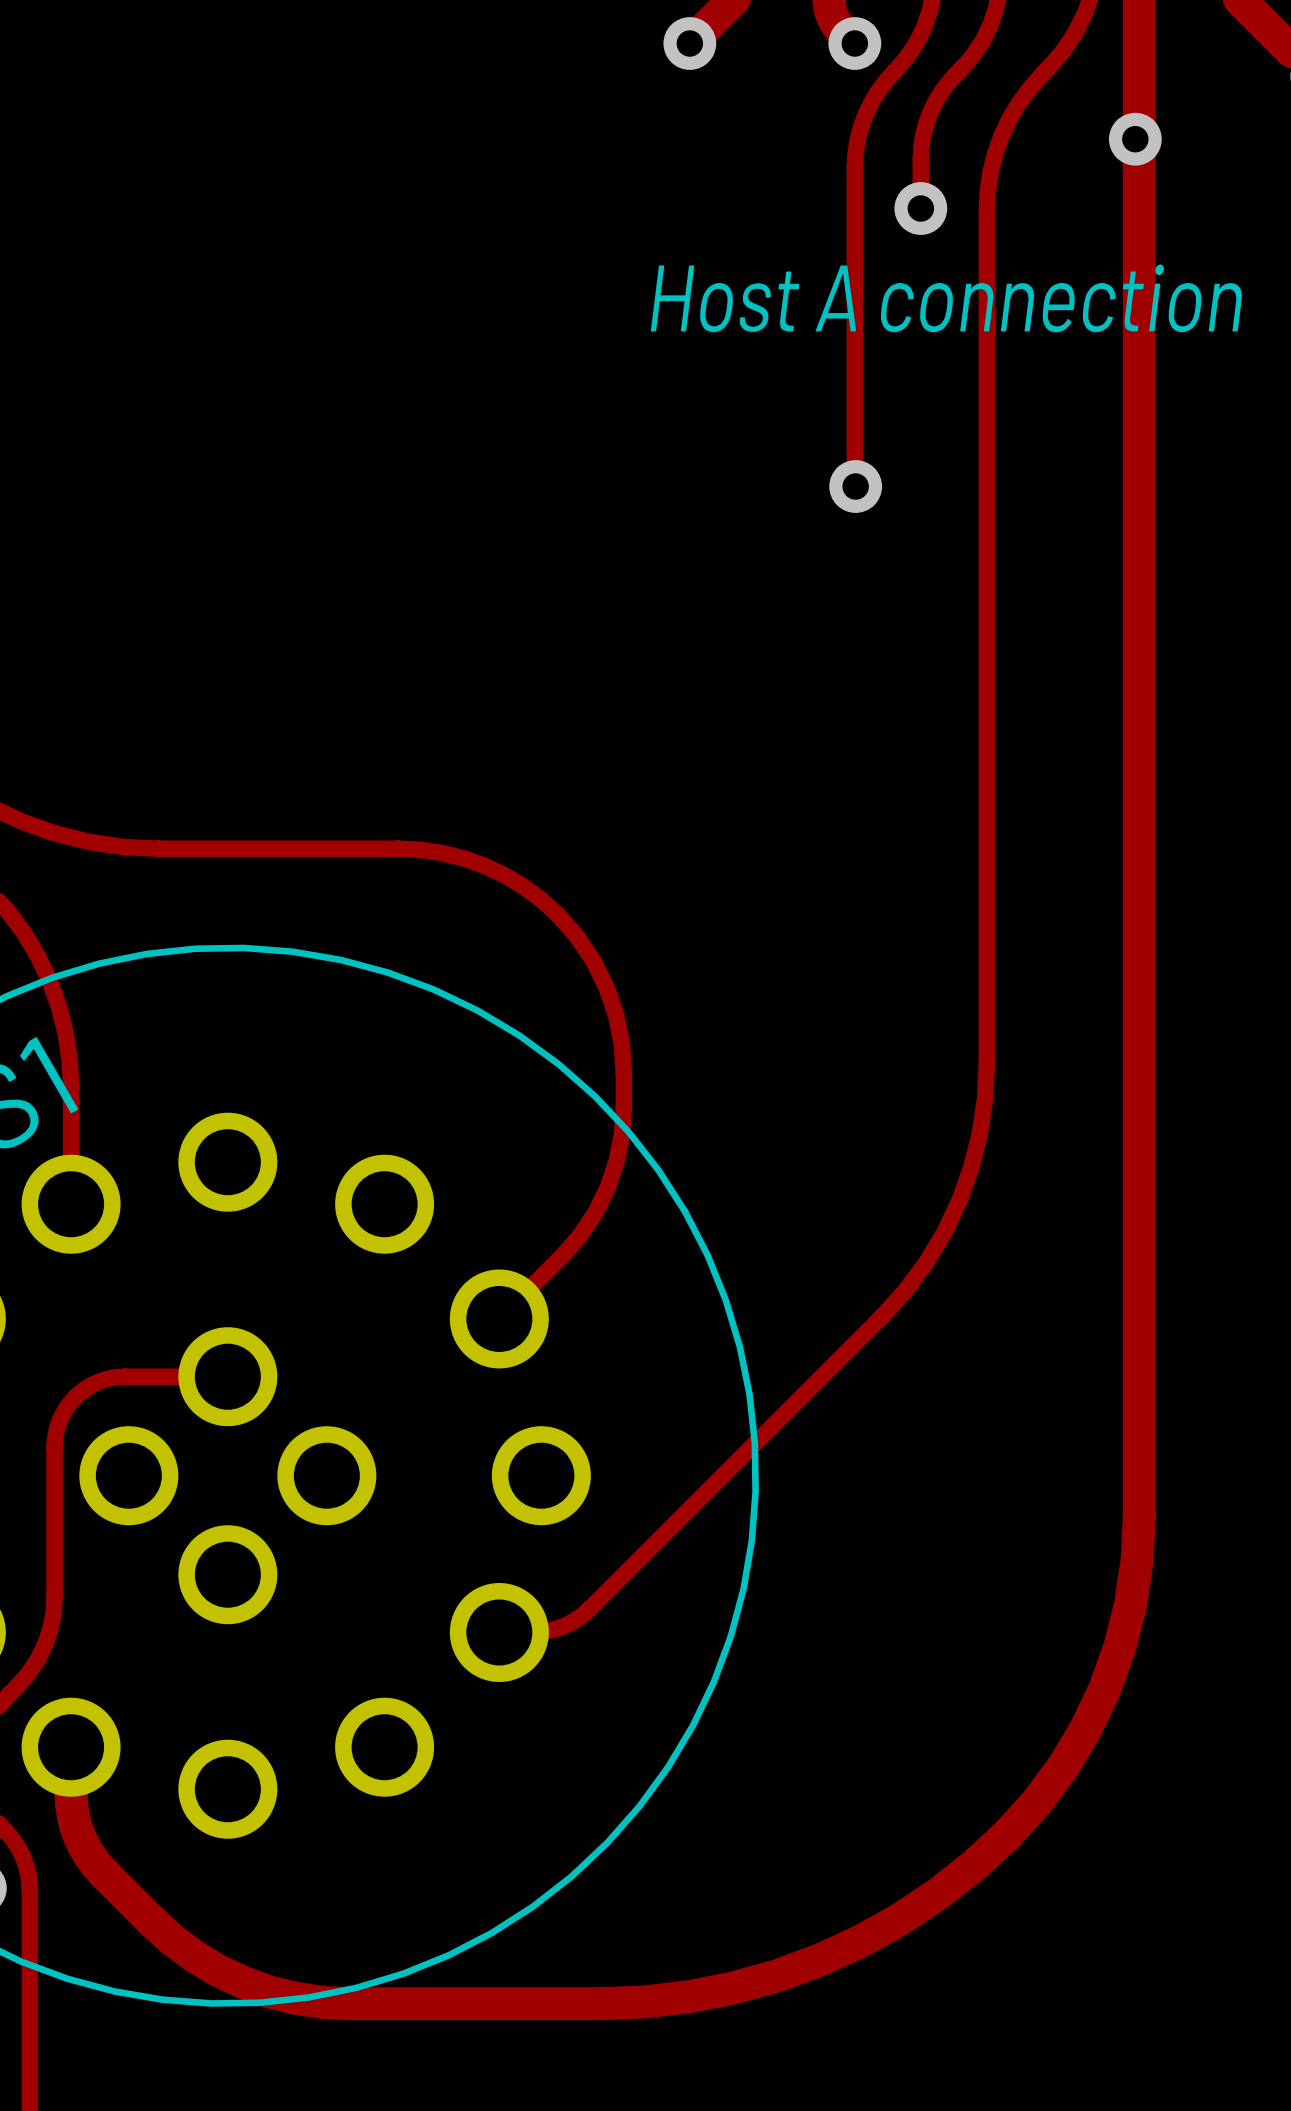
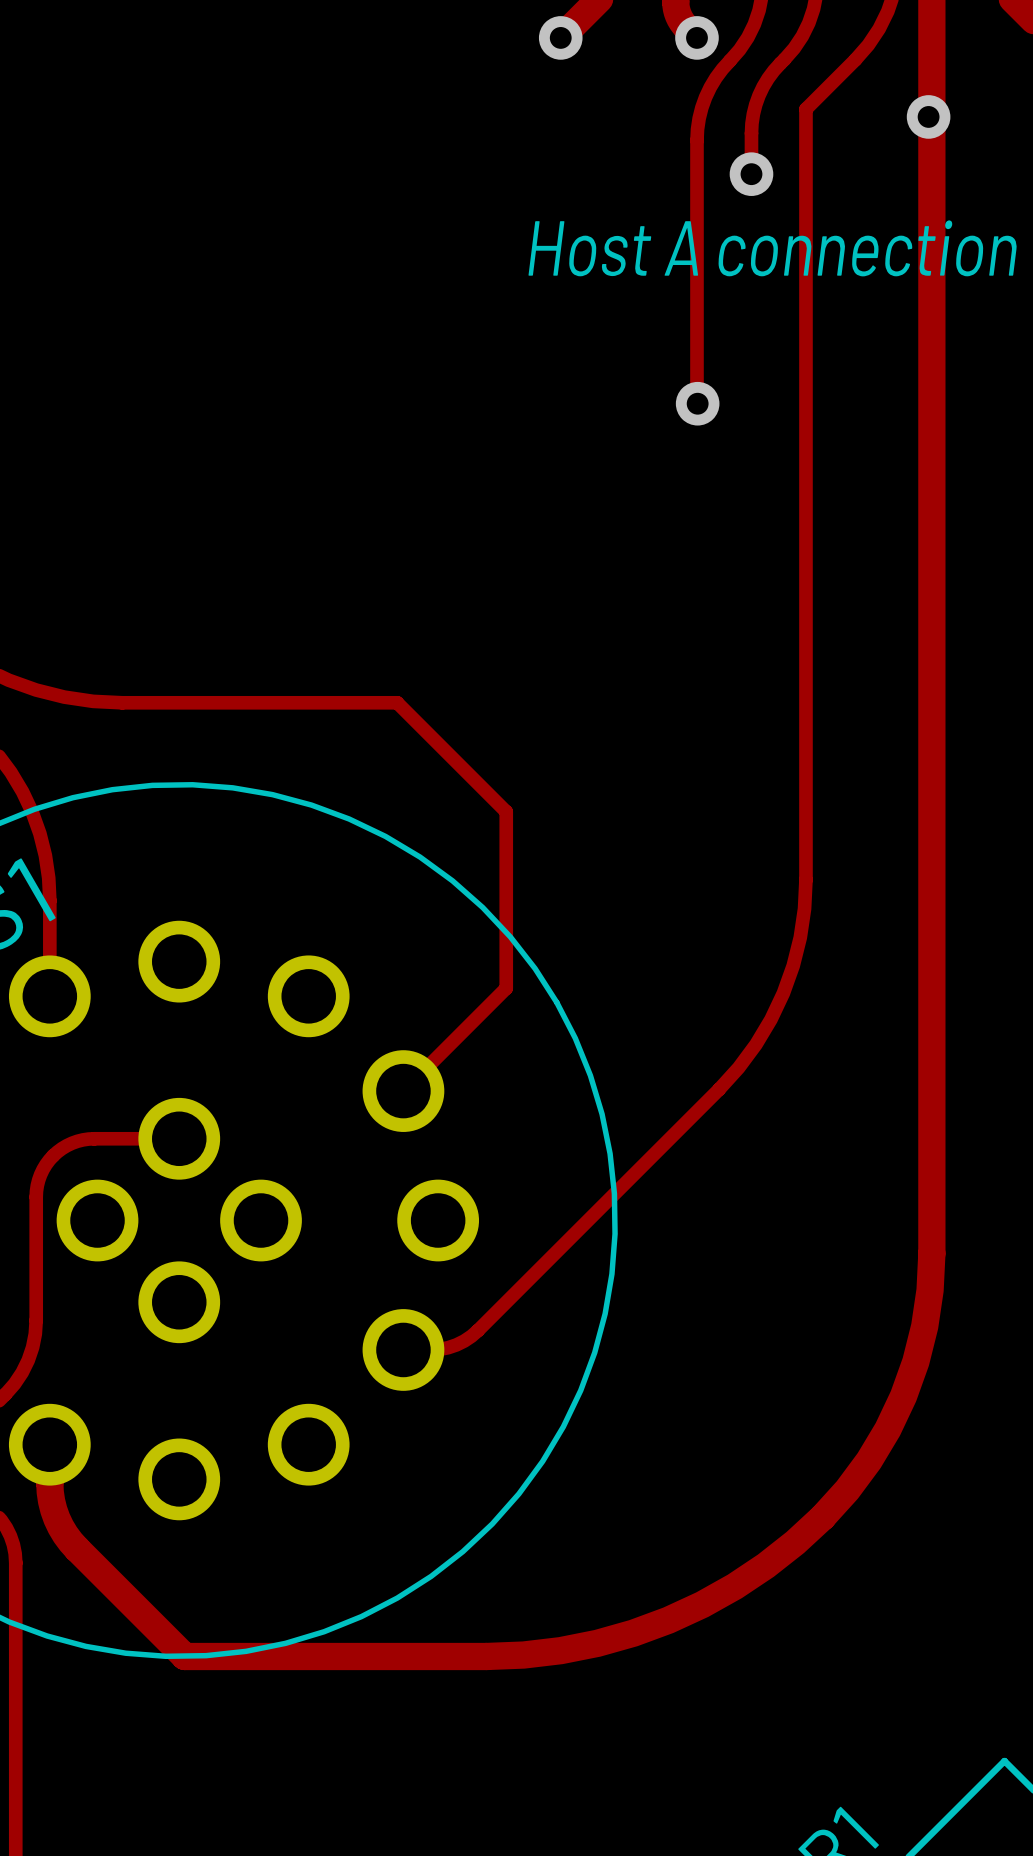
track: (1043, 73) (1019, 102) (1001, 135) (990, 172) (986, 209) -> (852, 62) (805, 109) (805, 175)
track: (398, 848) (442, 853) (484, 865) (523, 886) (557, 914) (577, 936) (593, 961) (606, 987) (616, 1015) (621, 1044) (623, 1074) -> (320, 702) (397, 702) (506, 811) (506, 888)
track: (623, 1106) (622, 1134) (616, 1161) (607, 1187) (595, 1212) (579, 1235) (561, 1256) -> (506, 915) (506, 988) (454, 1039)
track: (152, 1922) (195, 1956) (243, 1982) (295, 1998) (349, 2003) -> (117, 1589) (184, 1656) (280, 1656)

